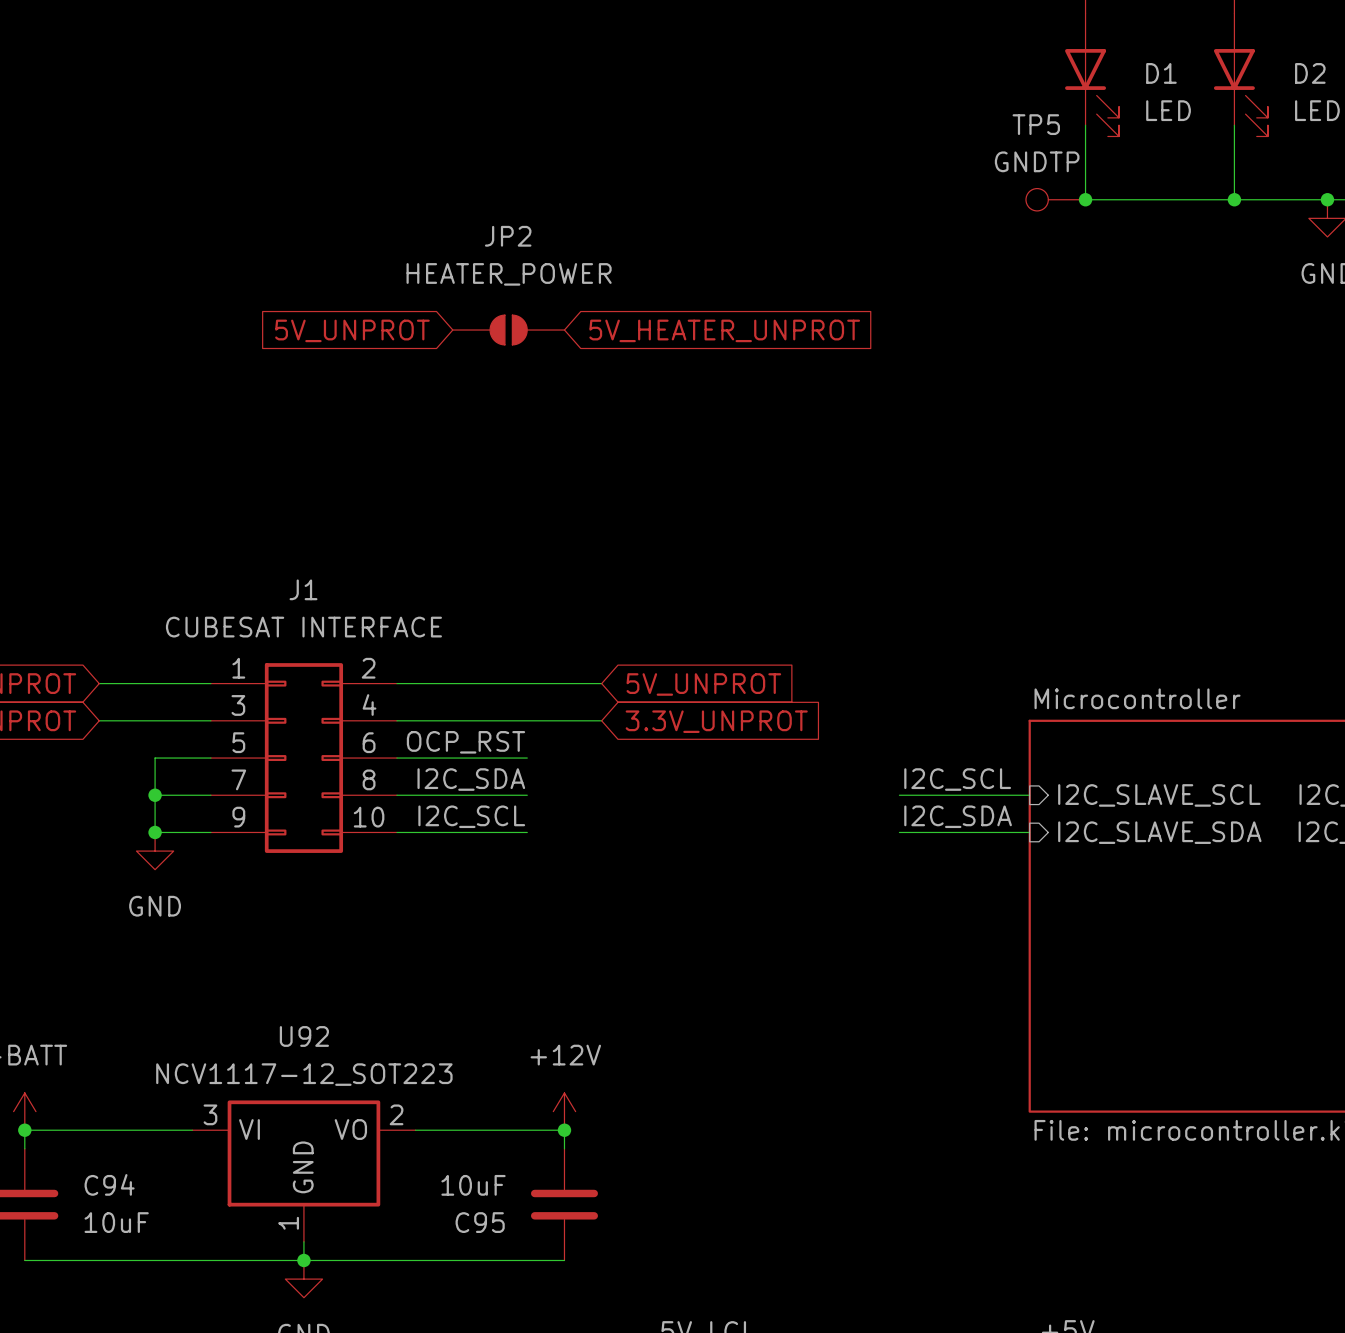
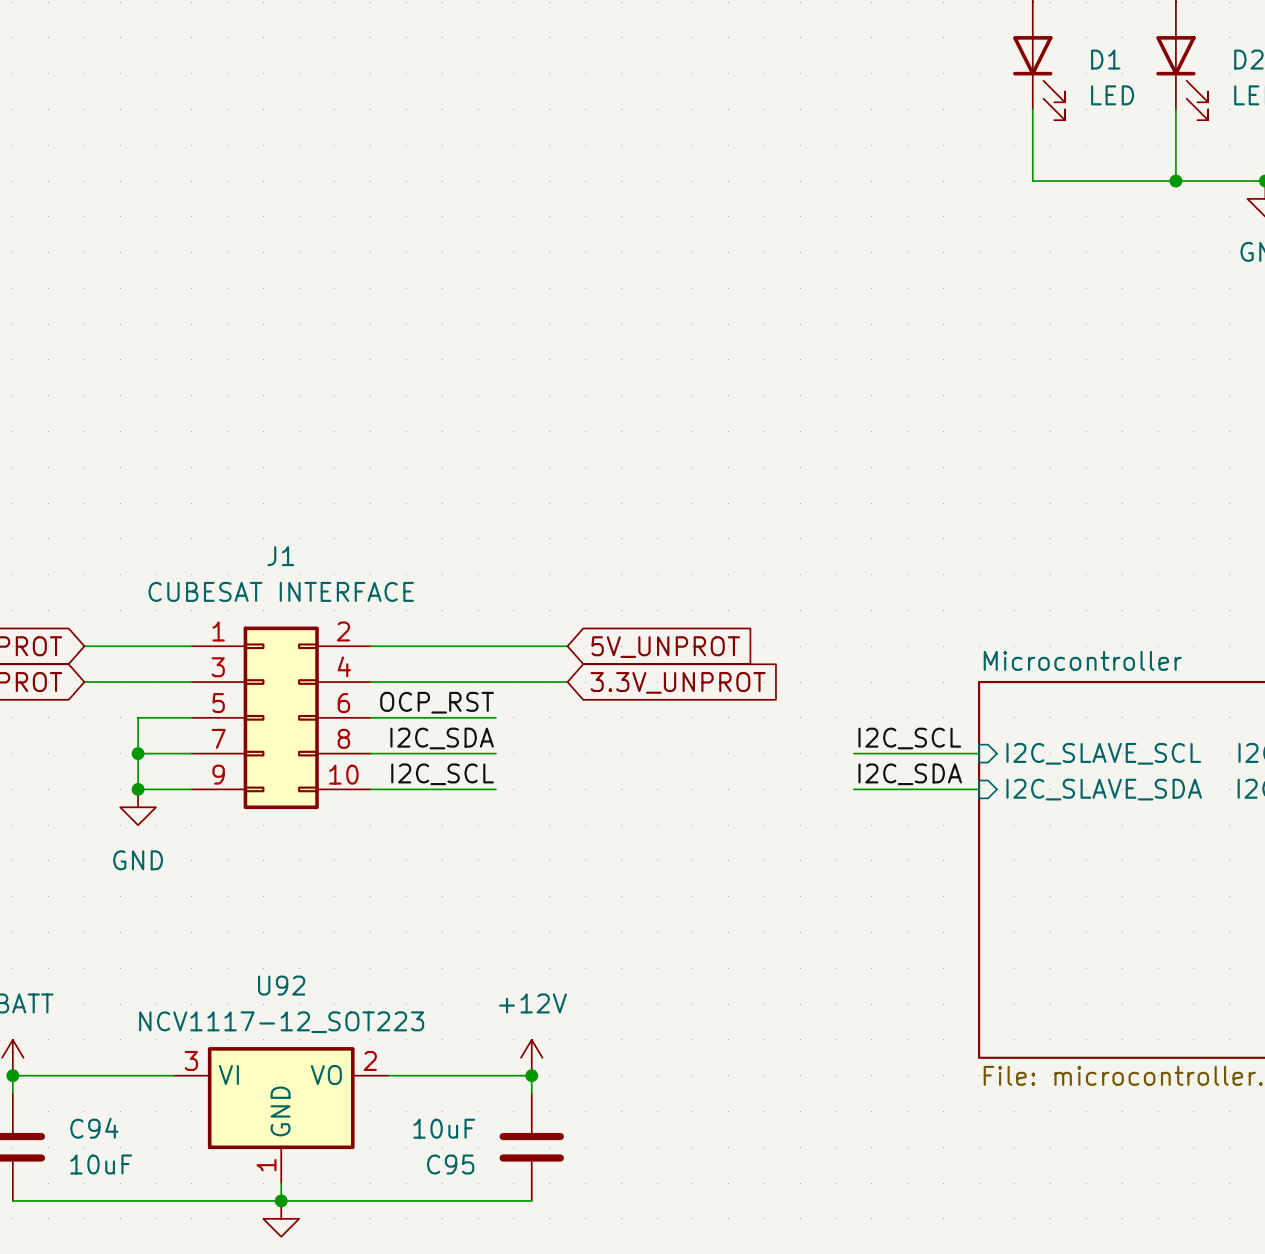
TP5: GNDTP (1055, 199) -> none
junction: (1085, 199) -> none
global label: 5V_UNPROT (352, 330) -> none
JP2: HEATER_POWER (508, 330) -> none
global label: 5V_HEATER_UNPROT (724, 330) -> none

